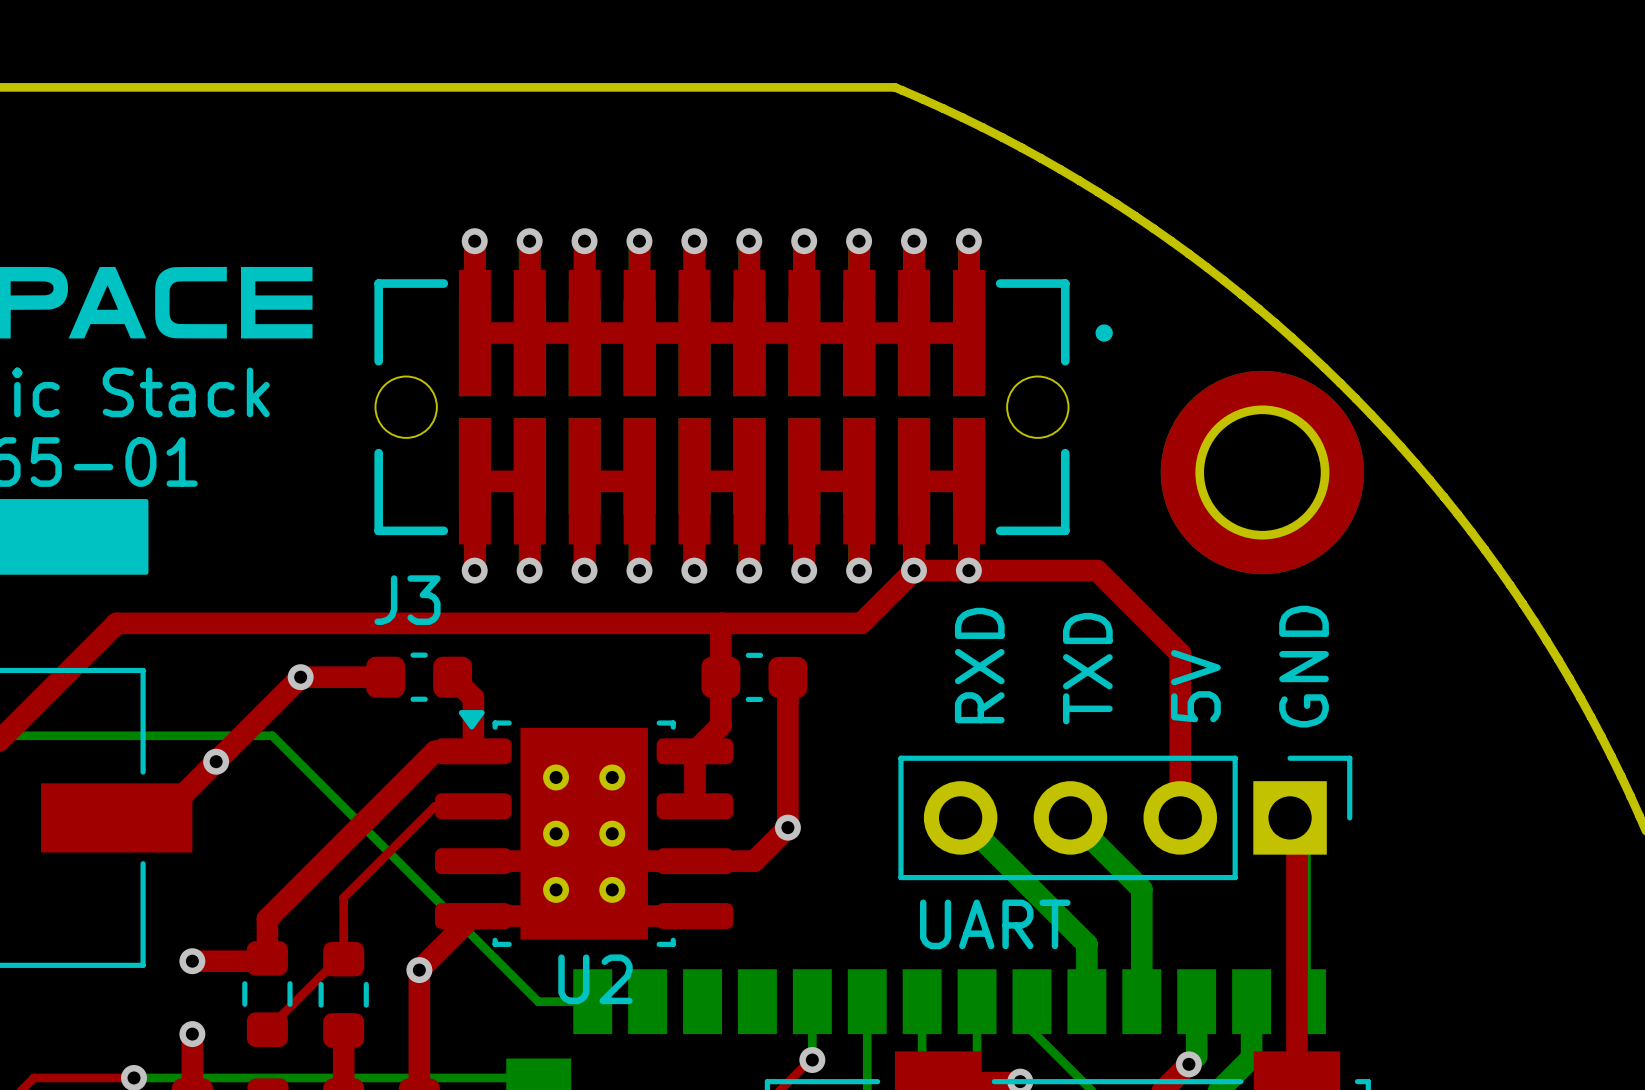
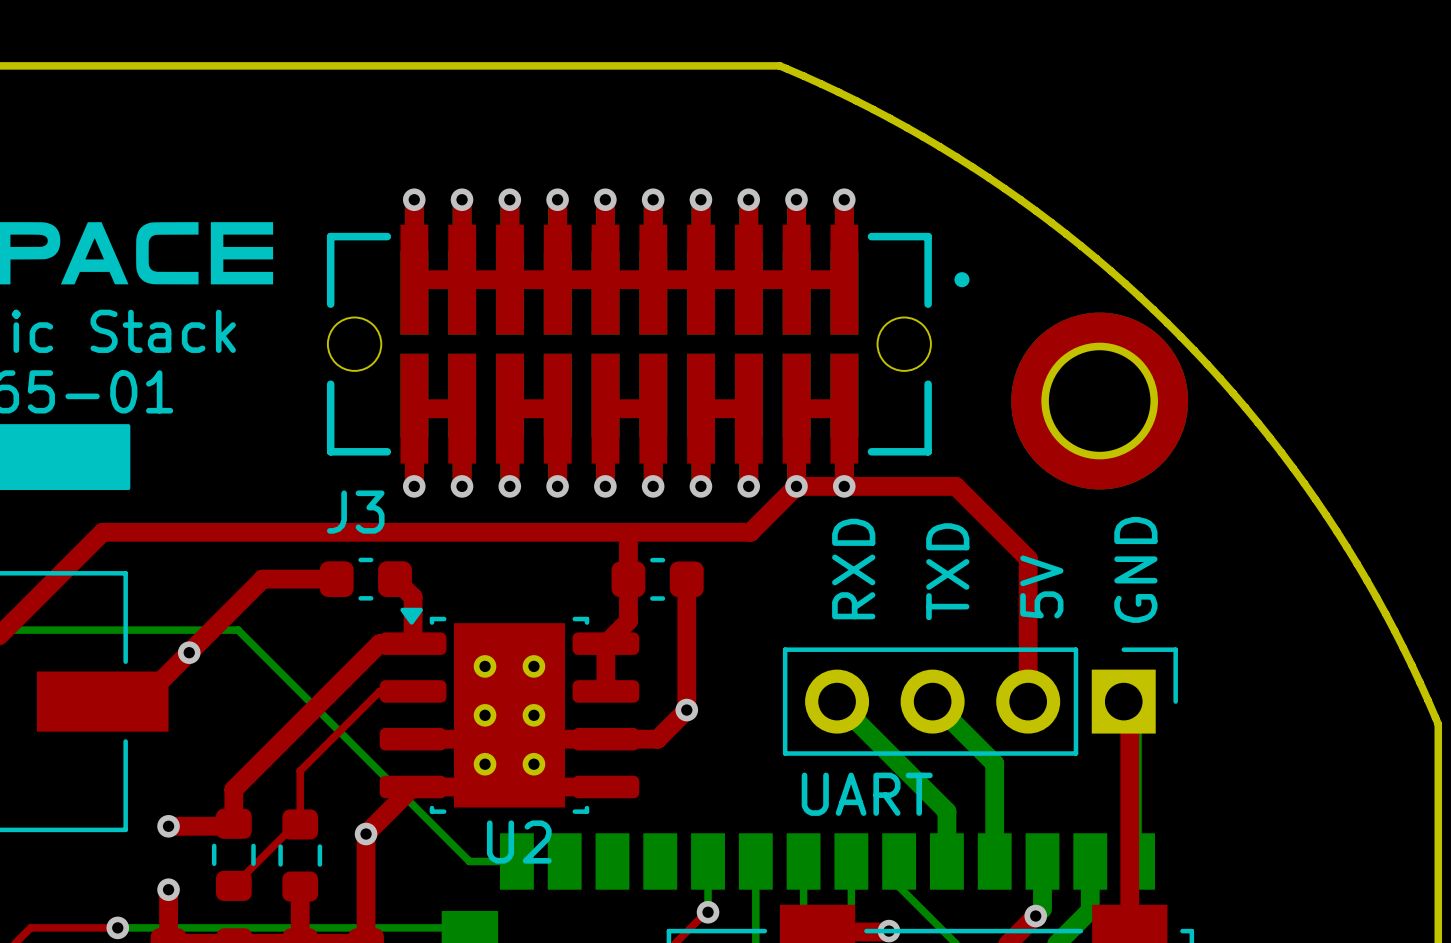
via: (300, 677) -> none

